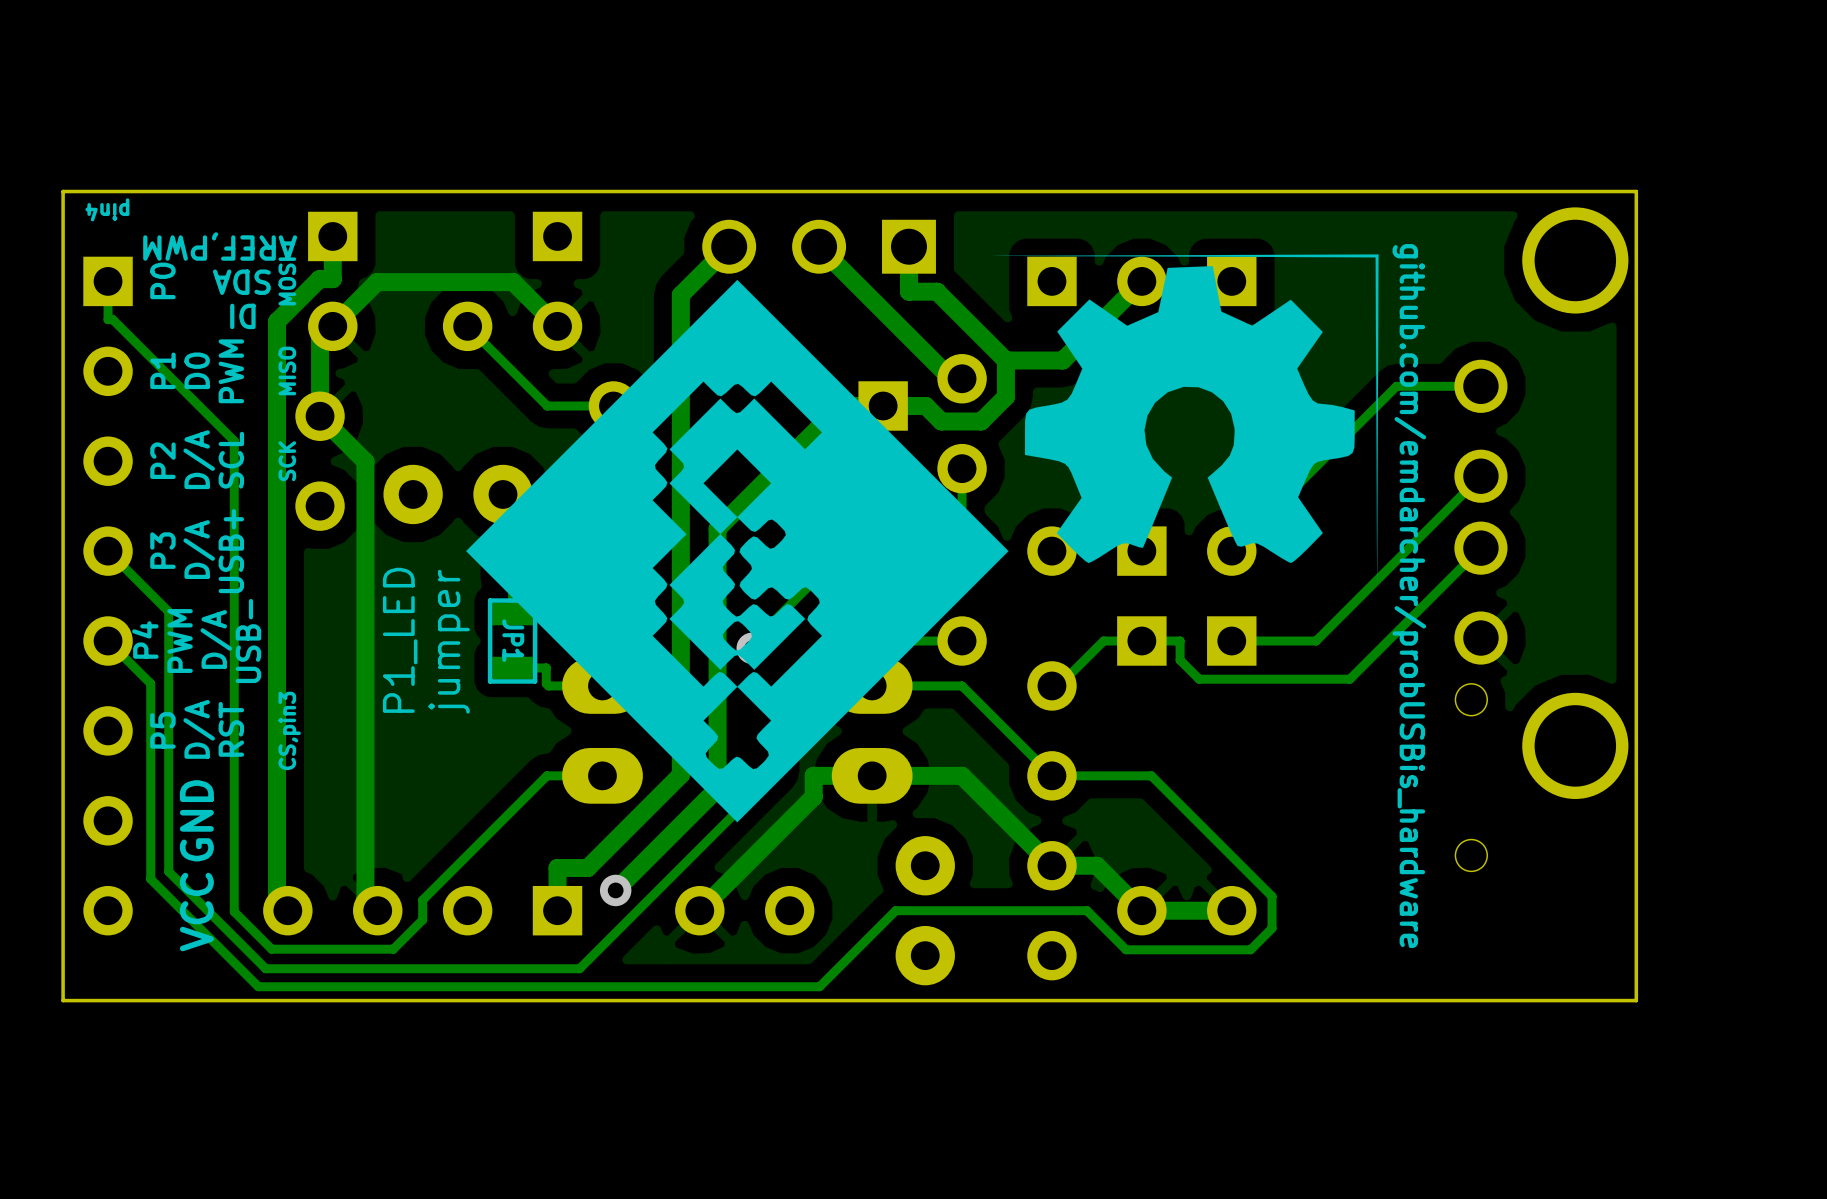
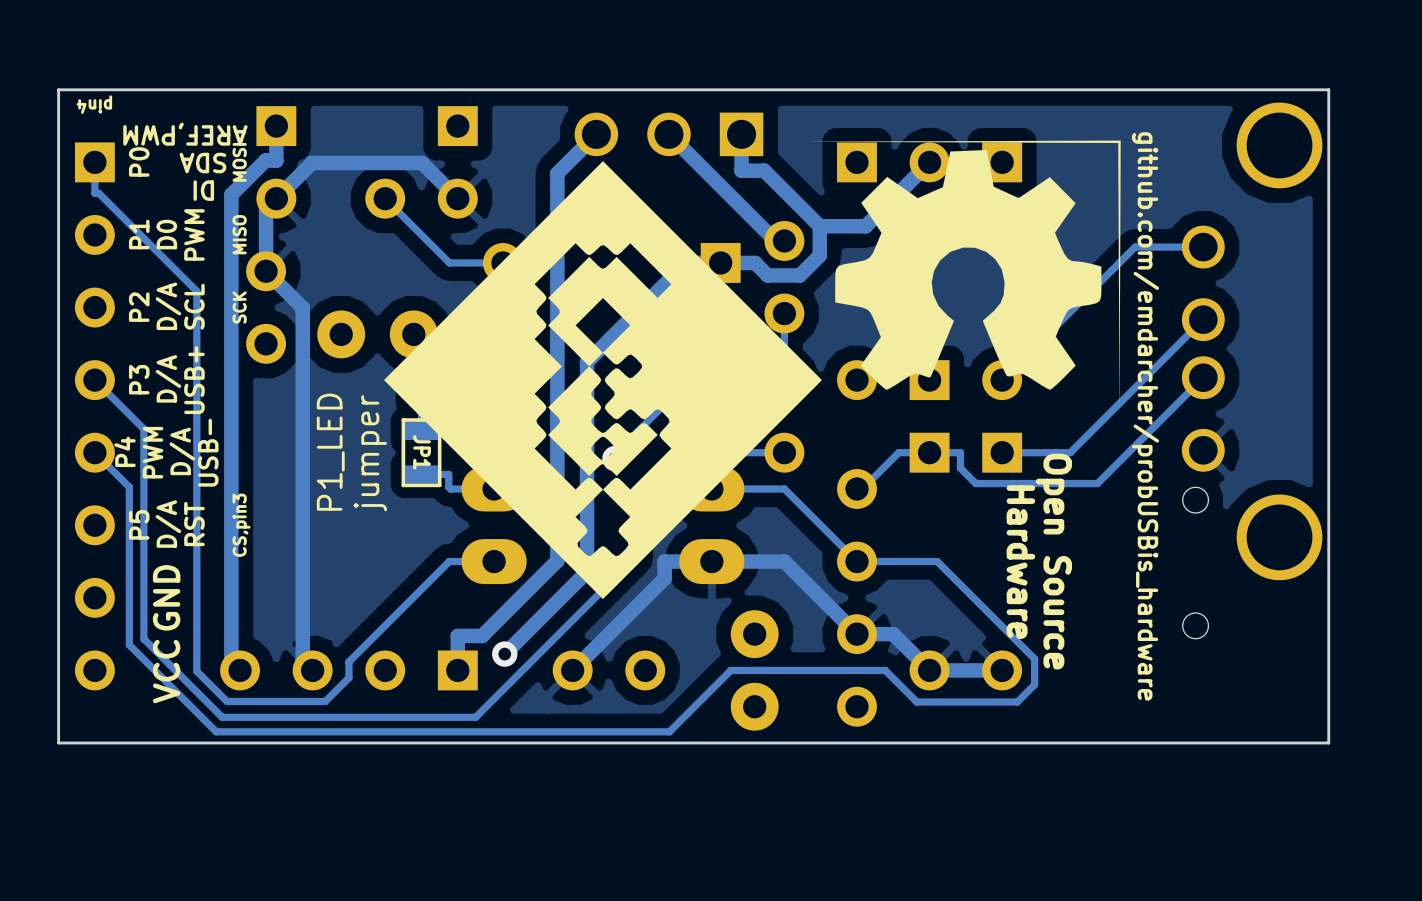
text: none -> Open Source (1053, 561)
text: none -> Hardware (1020, 562)

